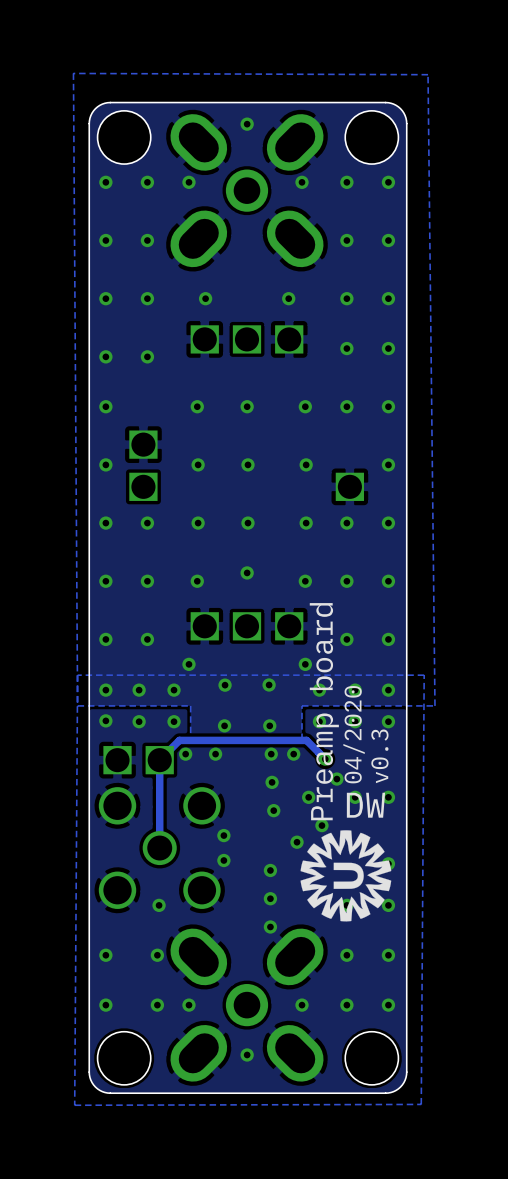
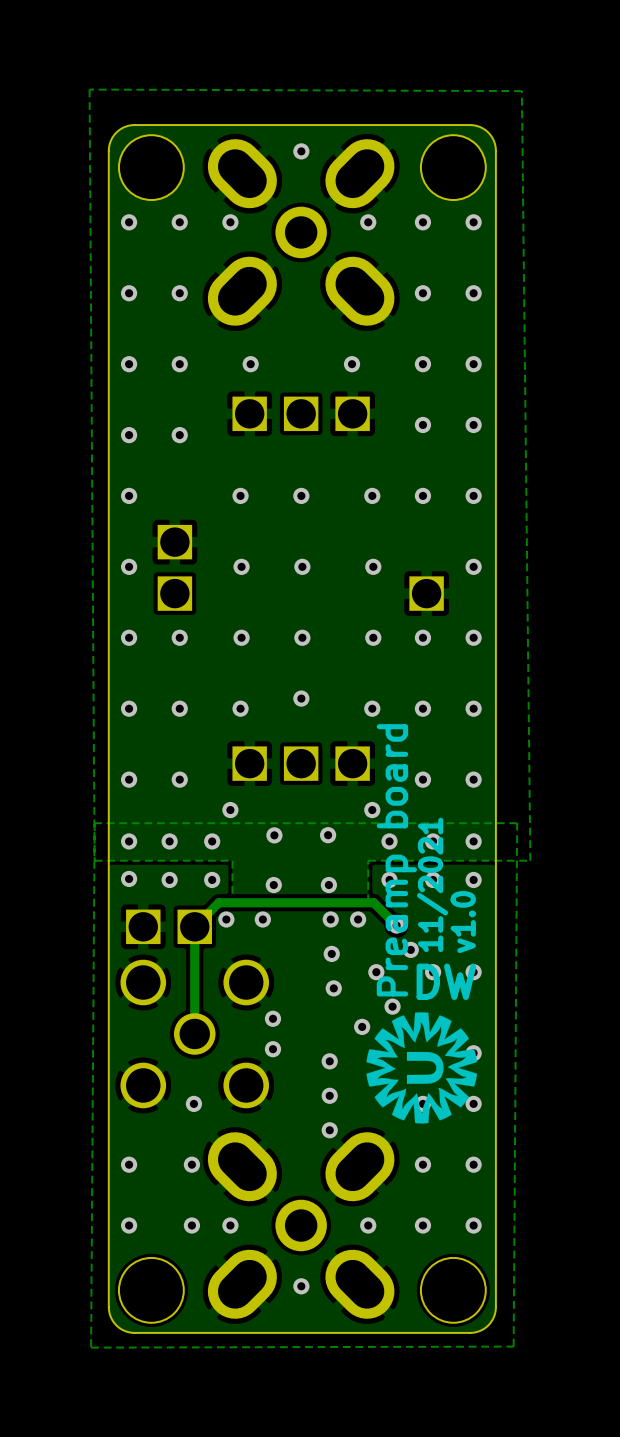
text: 04/2020 (354, 734) -> 11/2021 (432, 884)
text: v0.3 (379, 756) -> v1.0 (463, 922)

